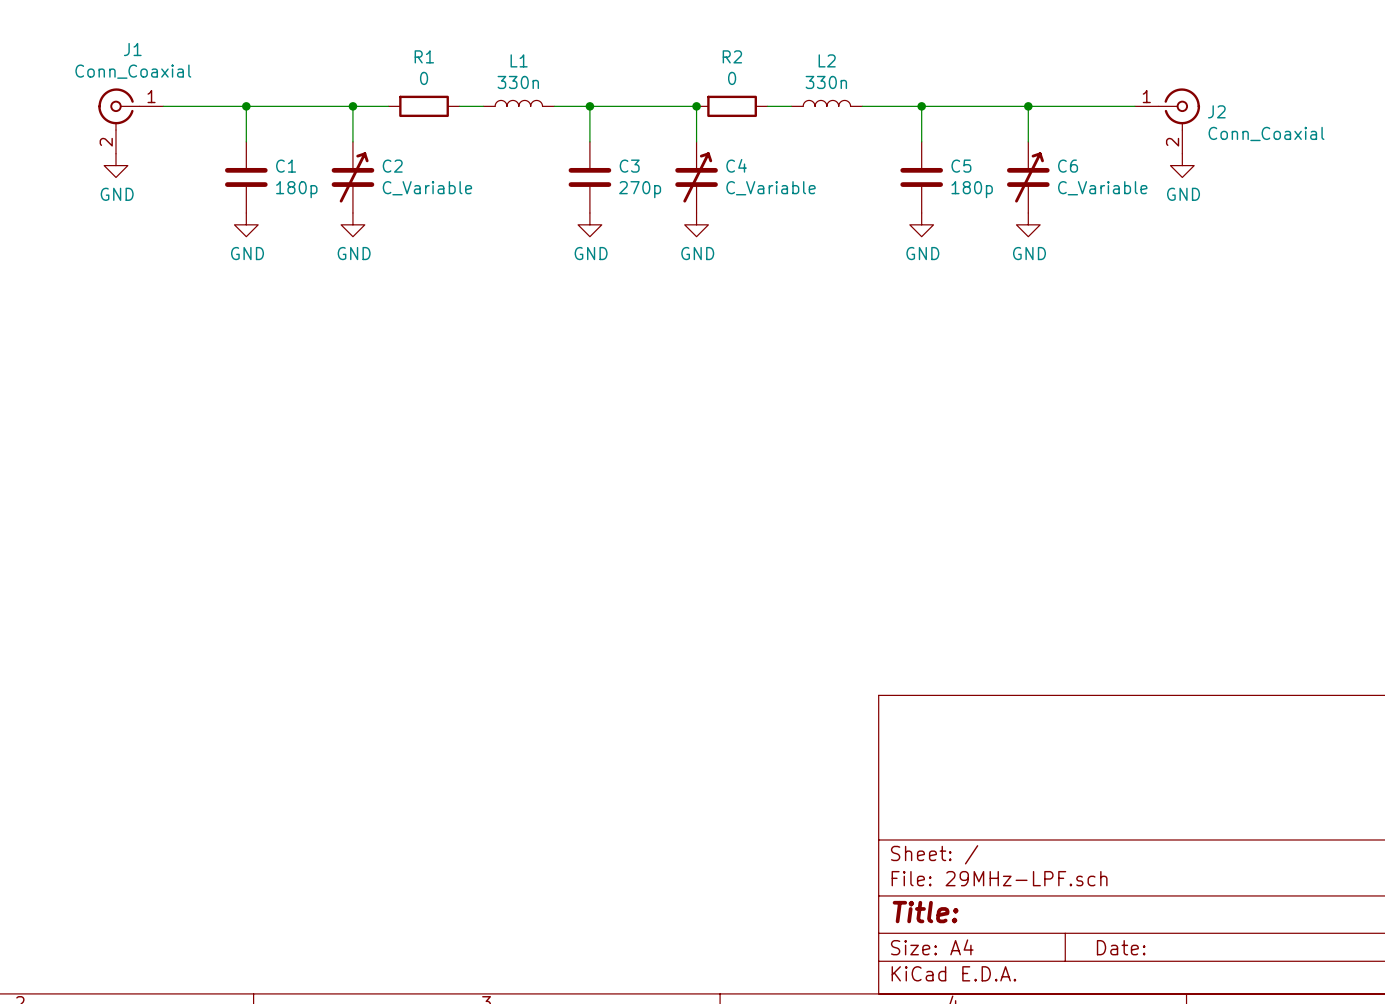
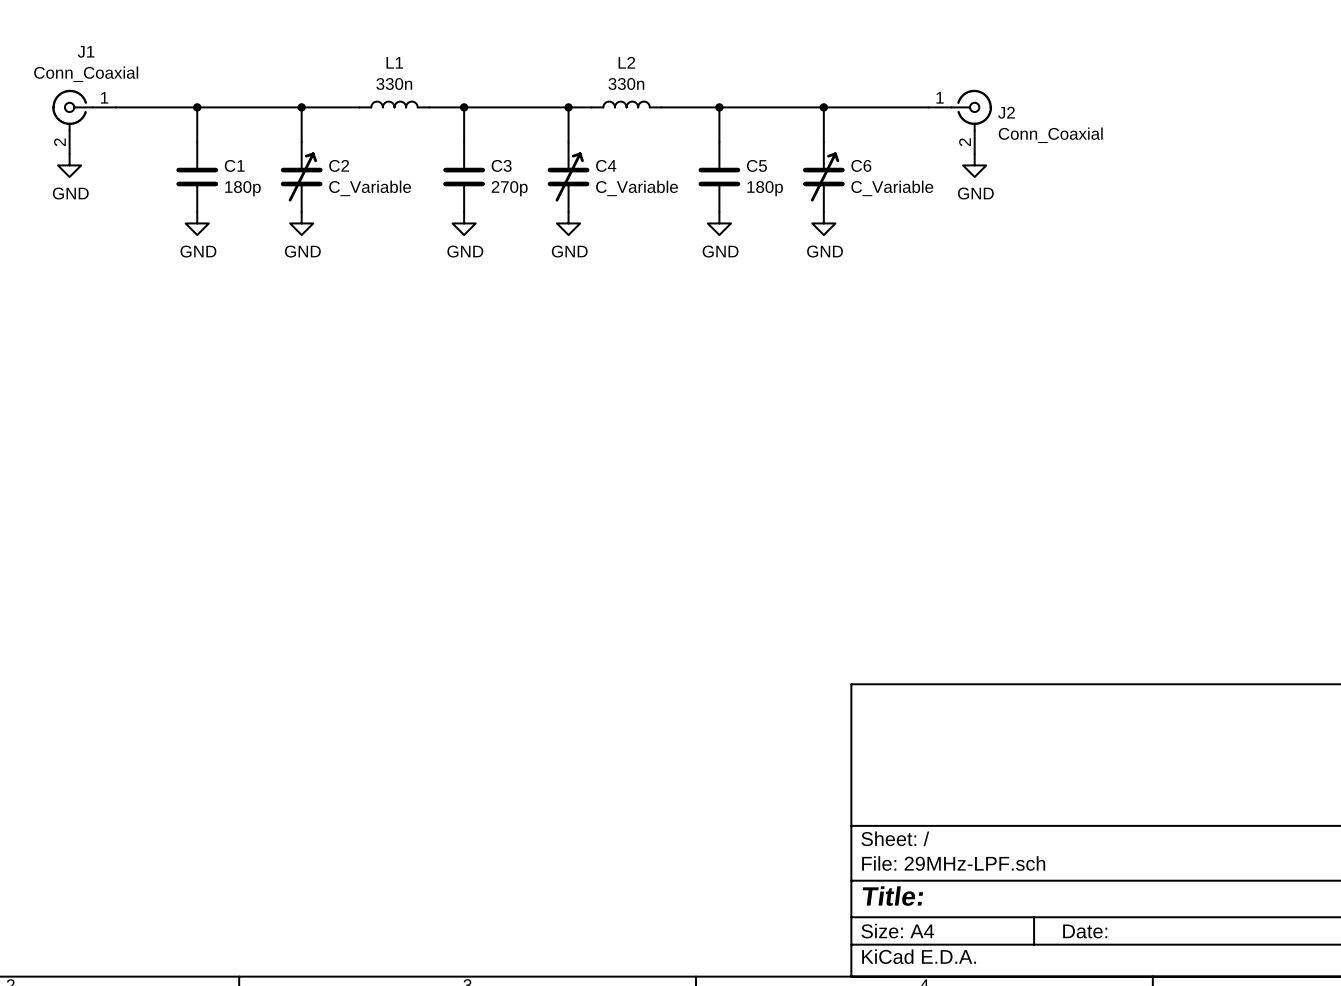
L1 position: (518, 103) -> (394, 104)
L2 position: (826, 103) -> (626, 104)
junction: none -> (197, 107)
wire: (246, 106) (246, 141) -> (197, 107) (197, 142)
junction: (246, 106) -> none
junction: none -> (301, 107)
wire: (352, 106) (352, 141) -> (301, 107) (301, 142)
junction: (352, 106) -> none
R1: 0 (424, 106) -> none
junction: none -> (464, 107)
wire: none -> (533, 107) (464, 107) (464, 142)
wire: (613, 106) (684, 106) -> (765, 107) (835, 107)
wire: (696, 106) (696, 141) -> (672, 107) (742, 107)
junction position: (696, 106) -> (719, 107)
R2: 0 (732, 106) -> none
junction: none -> (823, 107)
wire: (921, 106) (921, 141) -> (719, 107) (719, 142)
junction: (921, 106) -> none
wire: (957, 106) (1134, 106) -> none
wire: (1028, 106) (1028, 141) -> (823, 107) (823, 142)
junction: (1028, 106) -> none
J1 position: (130, 121) -> (84, 121)
J2 position: (1167, 121) -> (960, 121)
power symbol position: GND (115, 165) -> GND (69, 165)
power symbol: none -> GND (974, 165)
power symbol: GND (1182, 165) -> none
C1 position: (246, 177) -> (197, 177)
C2 position: (352, 177) -> (301, 177)
C3 position: (589, 177) -> (464, 177)
C4 position: (696, 177) -> (568, 177)
C5 position: (921, 177) -> (719, 177)
C6 position: (1028, 177) -> (823, 177)
power symbol: none -> GND (197, 223)
power symbol: GND (246, 224) -> none
power symbol: none -> GND (301, 223)
power symbol: GND (352, 224) -> none
power symbol: none -> GND (464, 223)
power symbol position: GND (696, 224) -> GND (719, 223)
power symbol: none -> GND (823, 223)
power symbol: GND (921, 224) -> none
power symbol: GND (1028, 224) -> none

